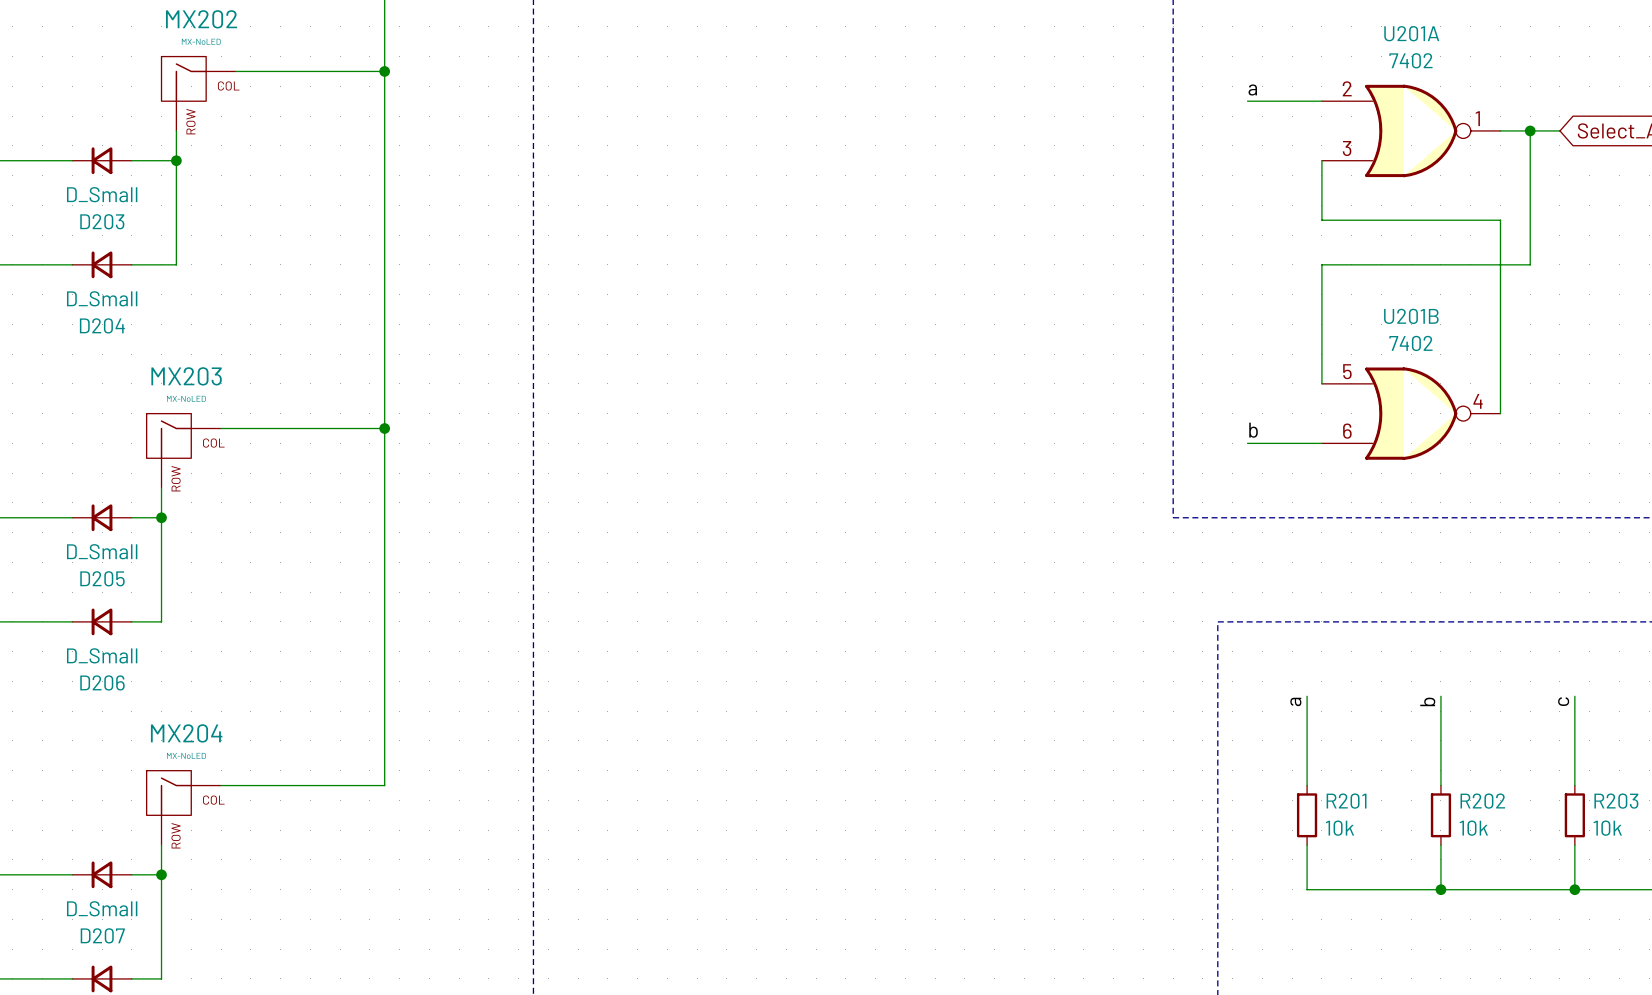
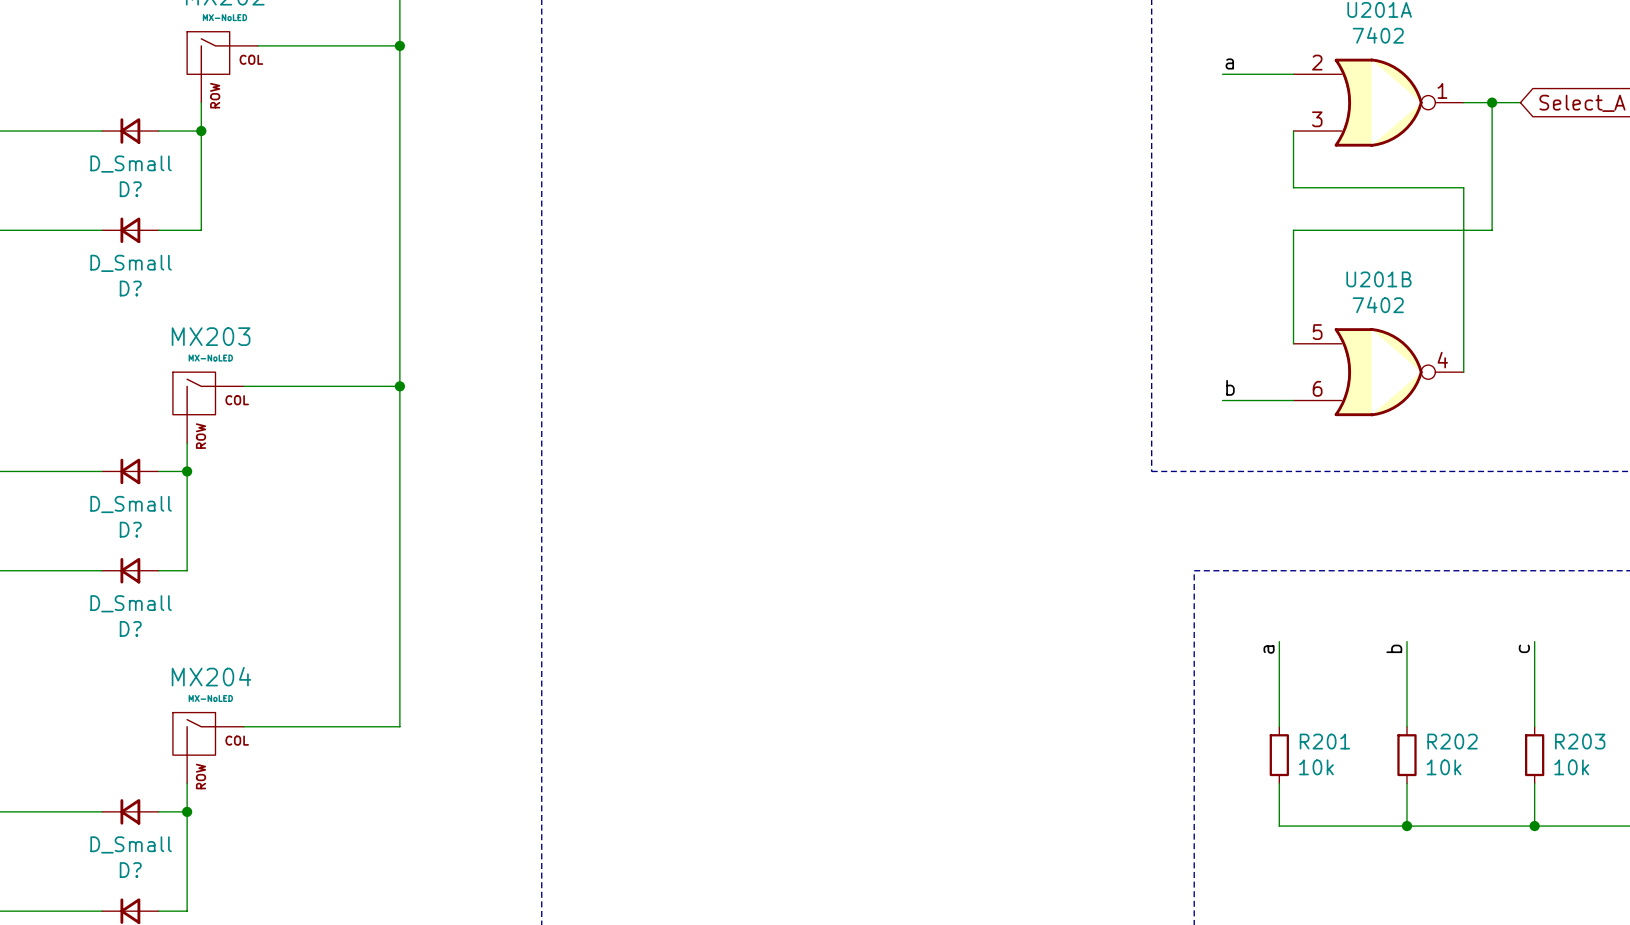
D203 name: D203 (102, 221) -> D? (130, 189)
D204 name: D204 (102, 325) -> D? (130, 288)
D205 name: D205 (102, 578) -> D? (130, 529)
D206 name: D206 (102, 682) -> D? (130, 628)
D207 name: D207 (102, 935) -> D? (130, 870)

